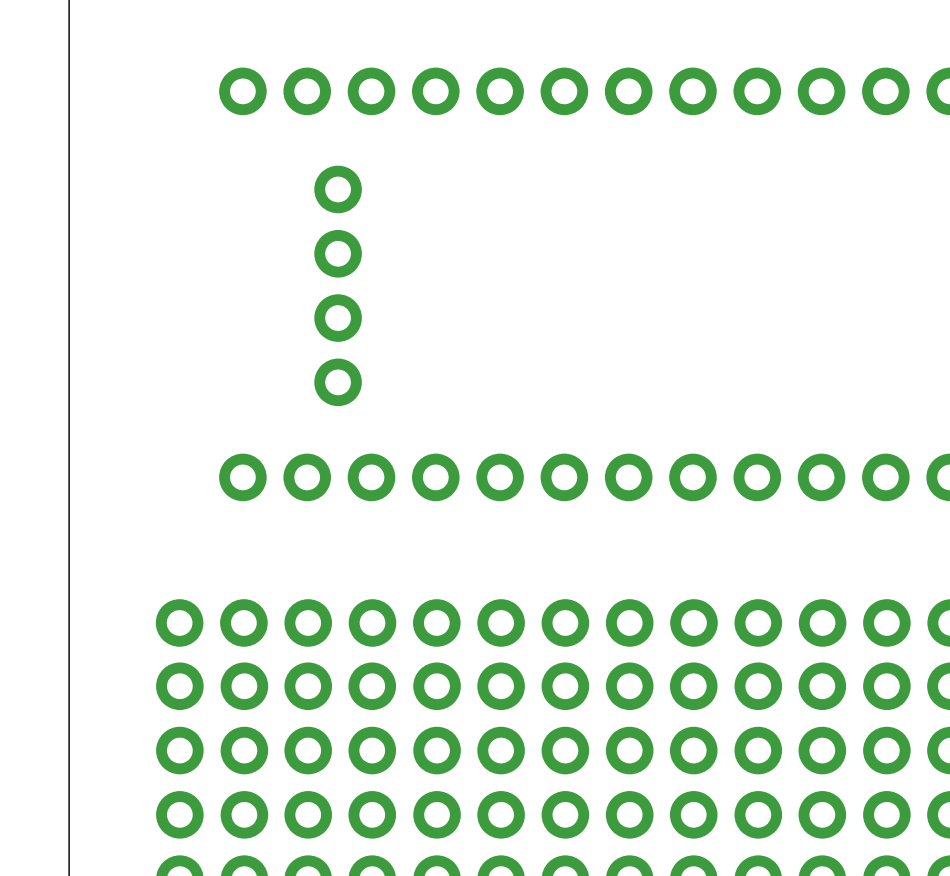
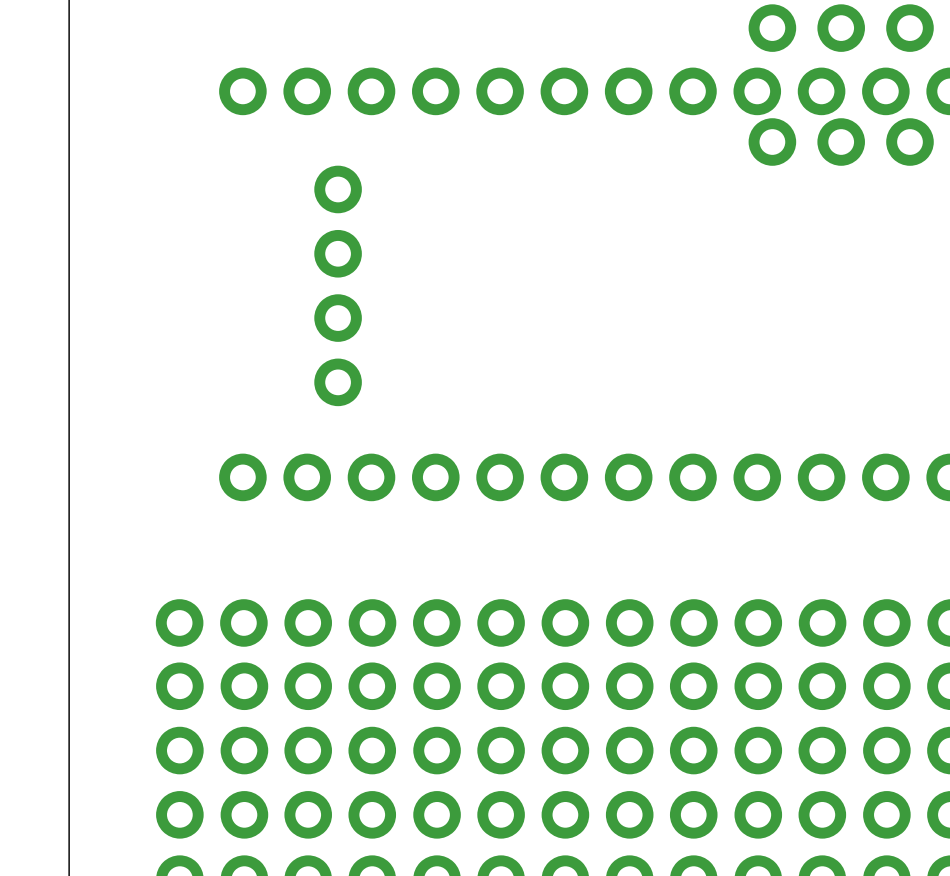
part: none -> (841, 28)
part: none -> (841, 142)

